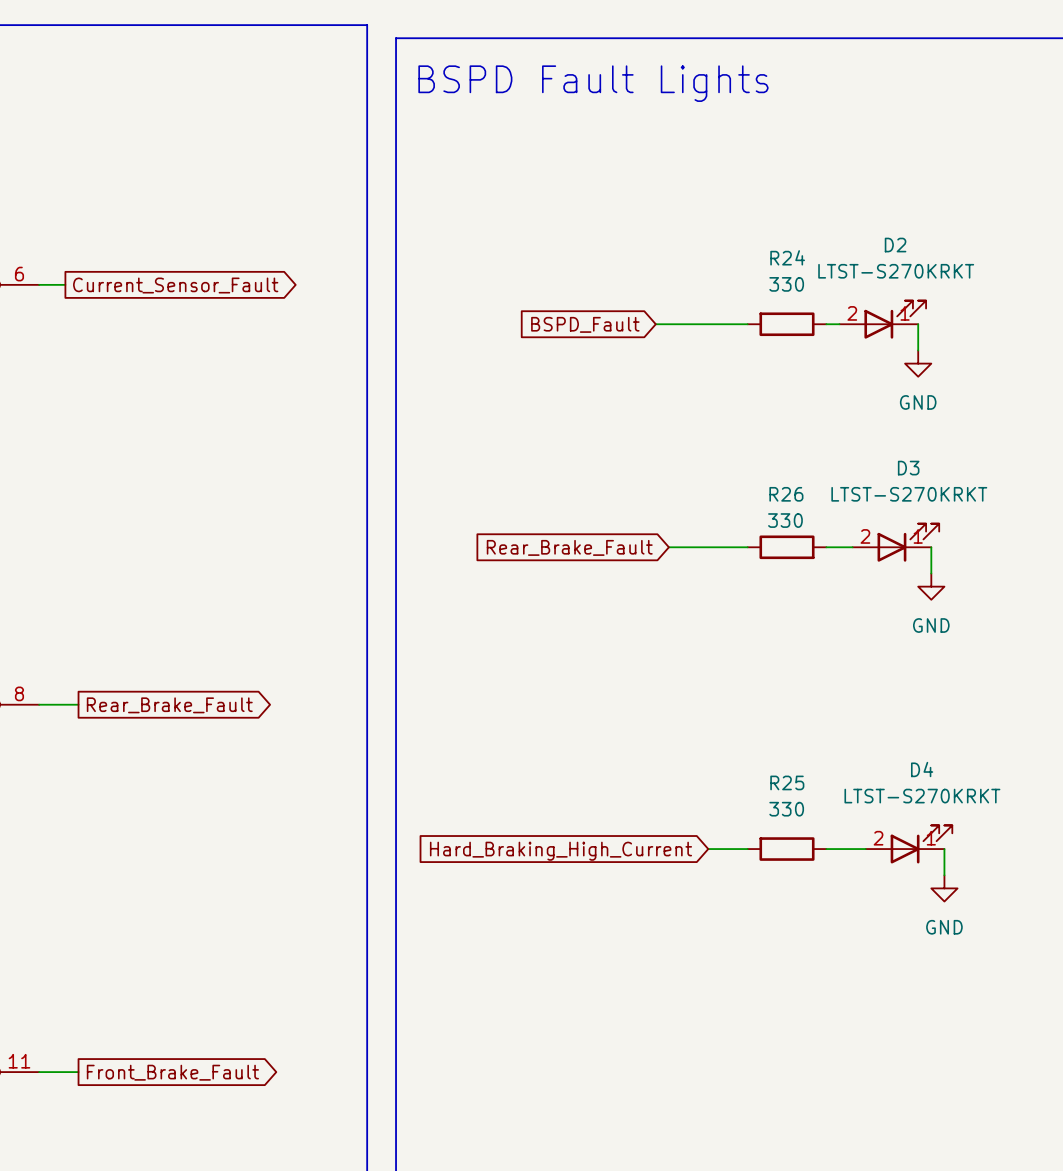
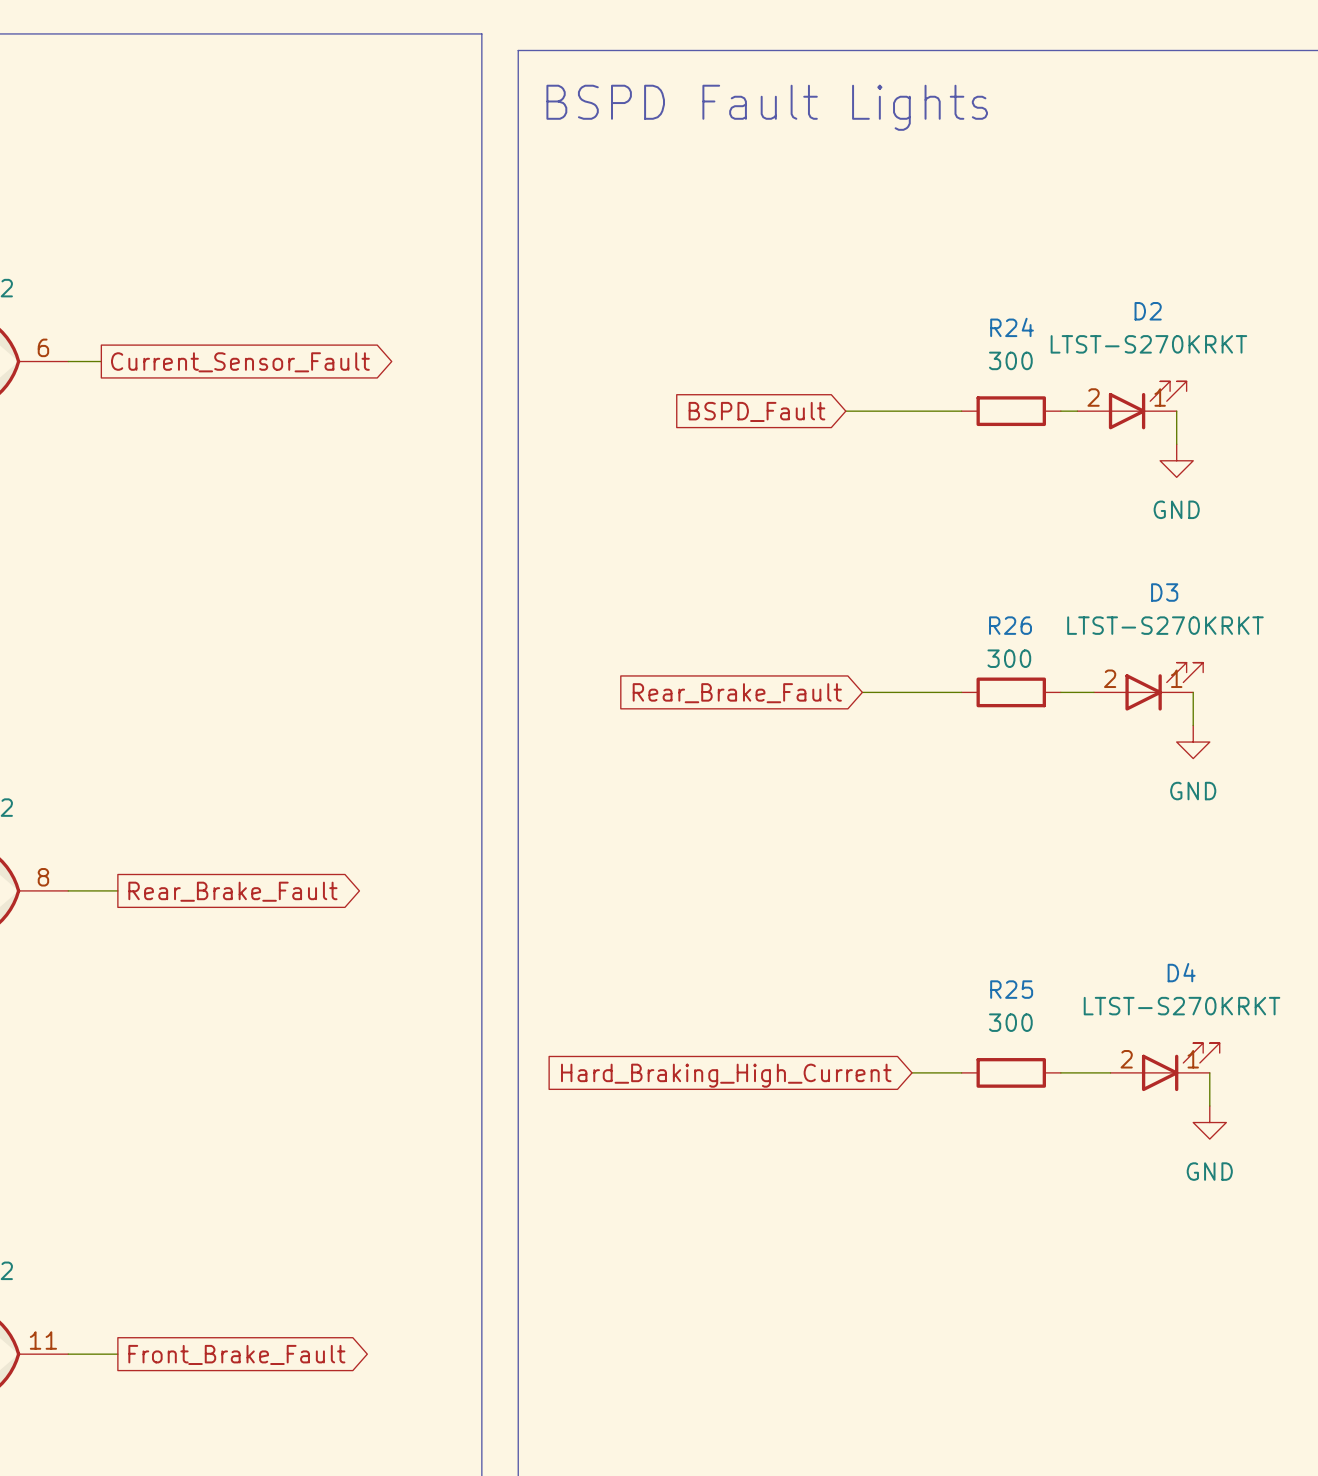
R24 value: 330 (786, 284) -> 300 (1010, 360)
R26 value: 330 (785, 520) -> 300 (1009, 658)
R25 value: 330 (786, 809) -> 300 (1010, 1022)

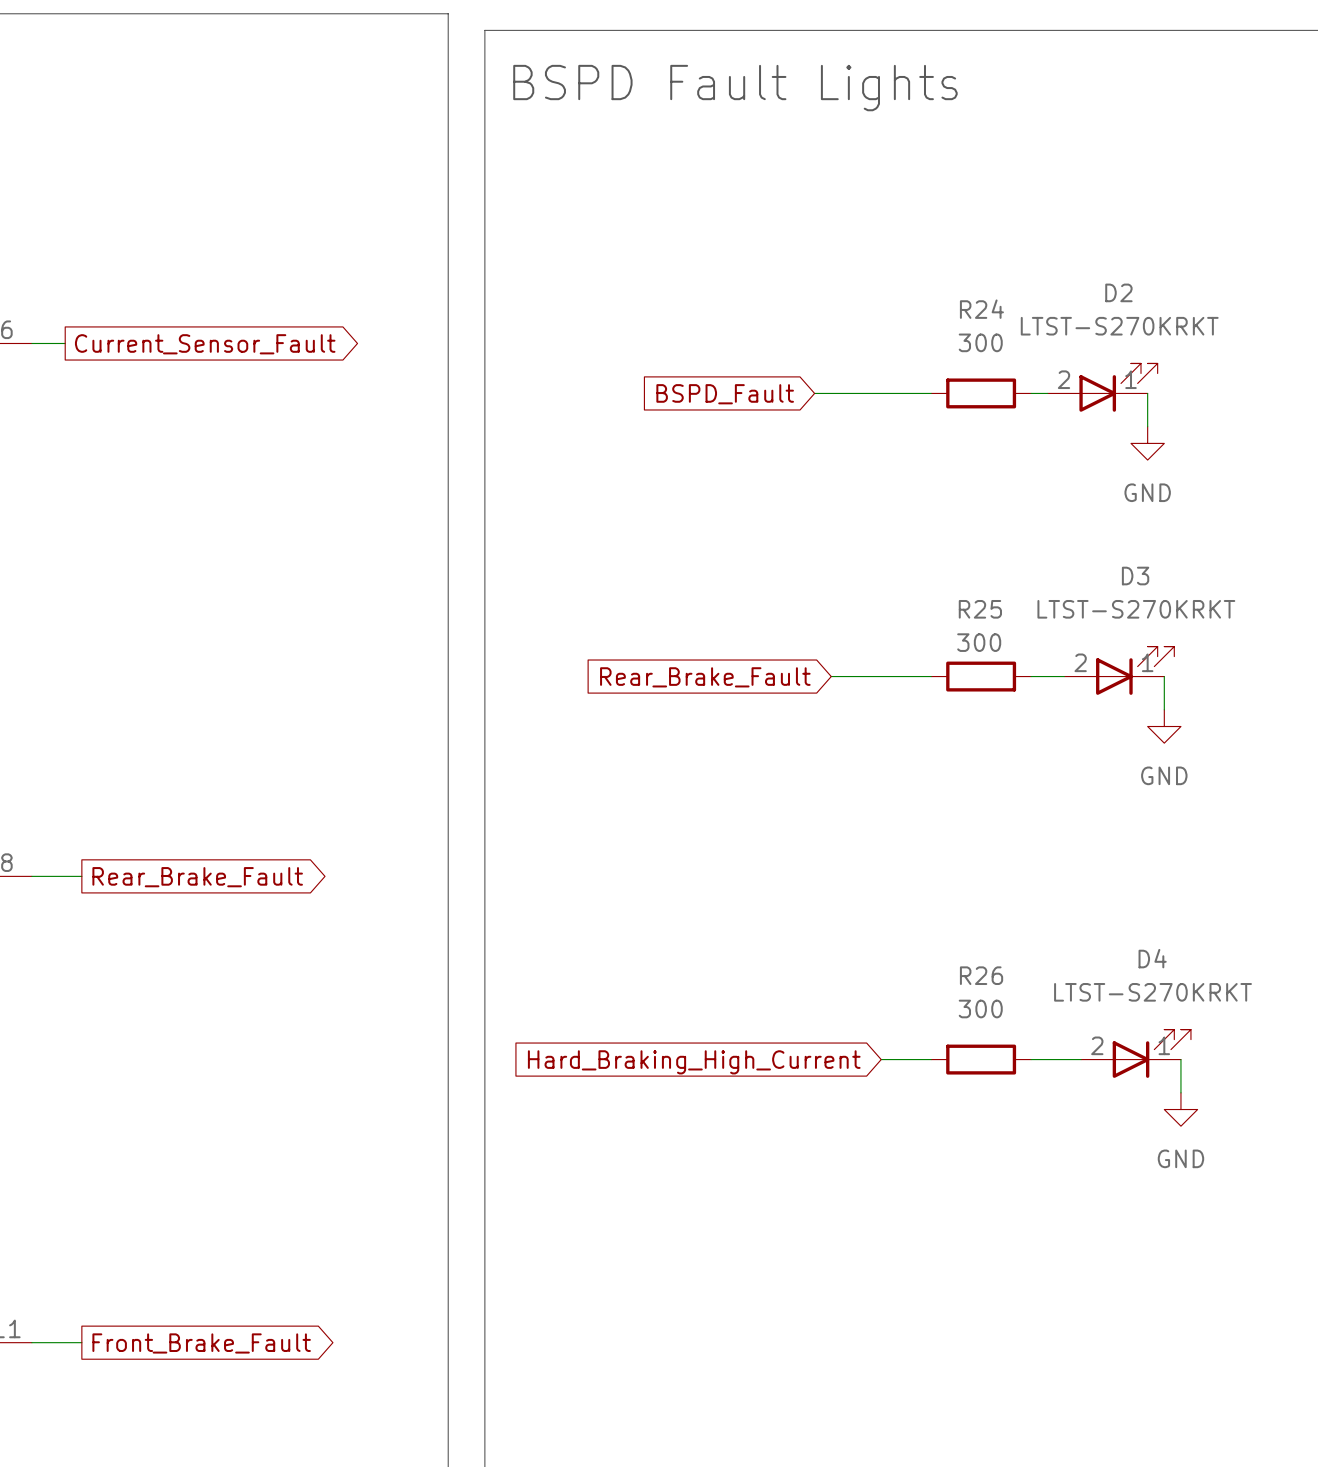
R26 name: R26 (1010, 625) -> R25 (980, 609)
R25 name: R25 (1011, 989) -> R26 (981, 975)

